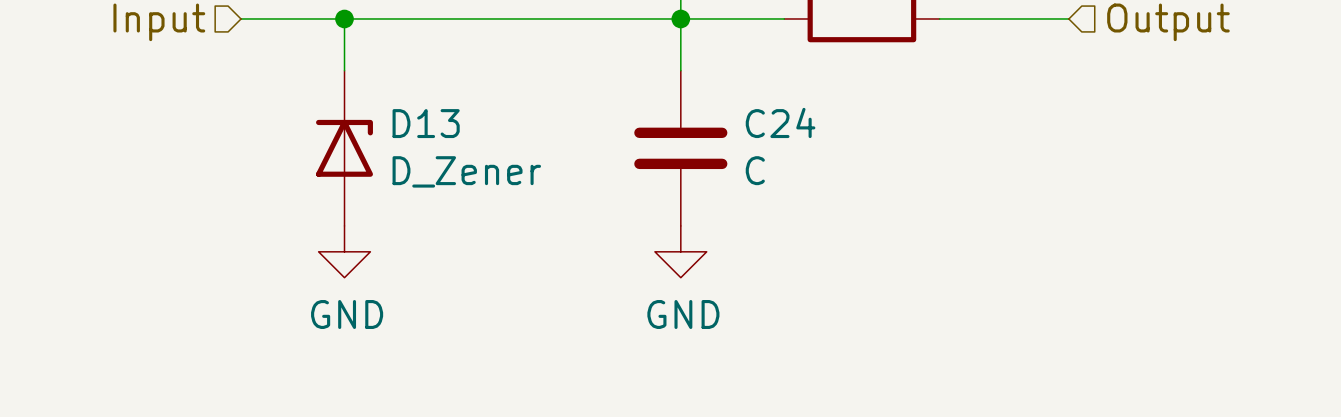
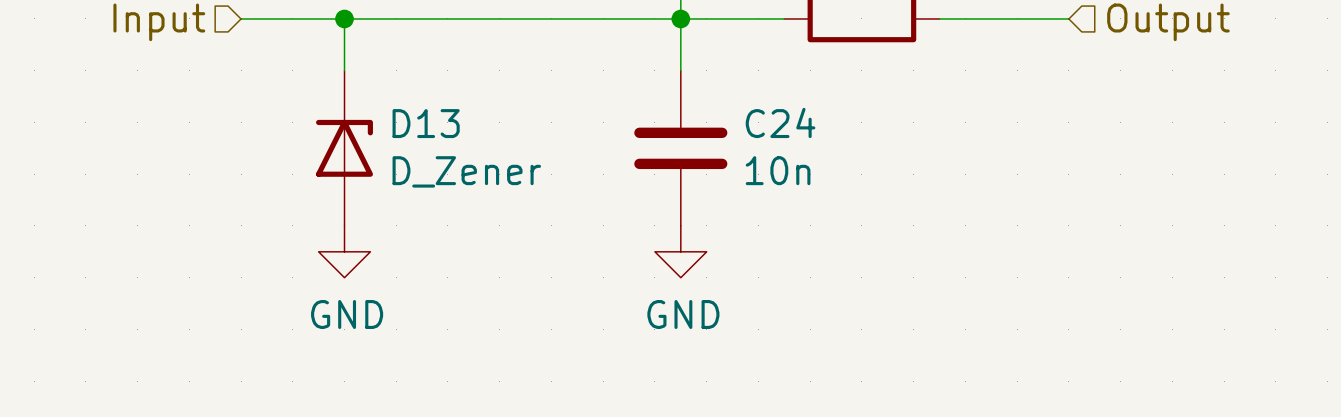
C24 value: C (755, 170) -> 10n (778, 170)

